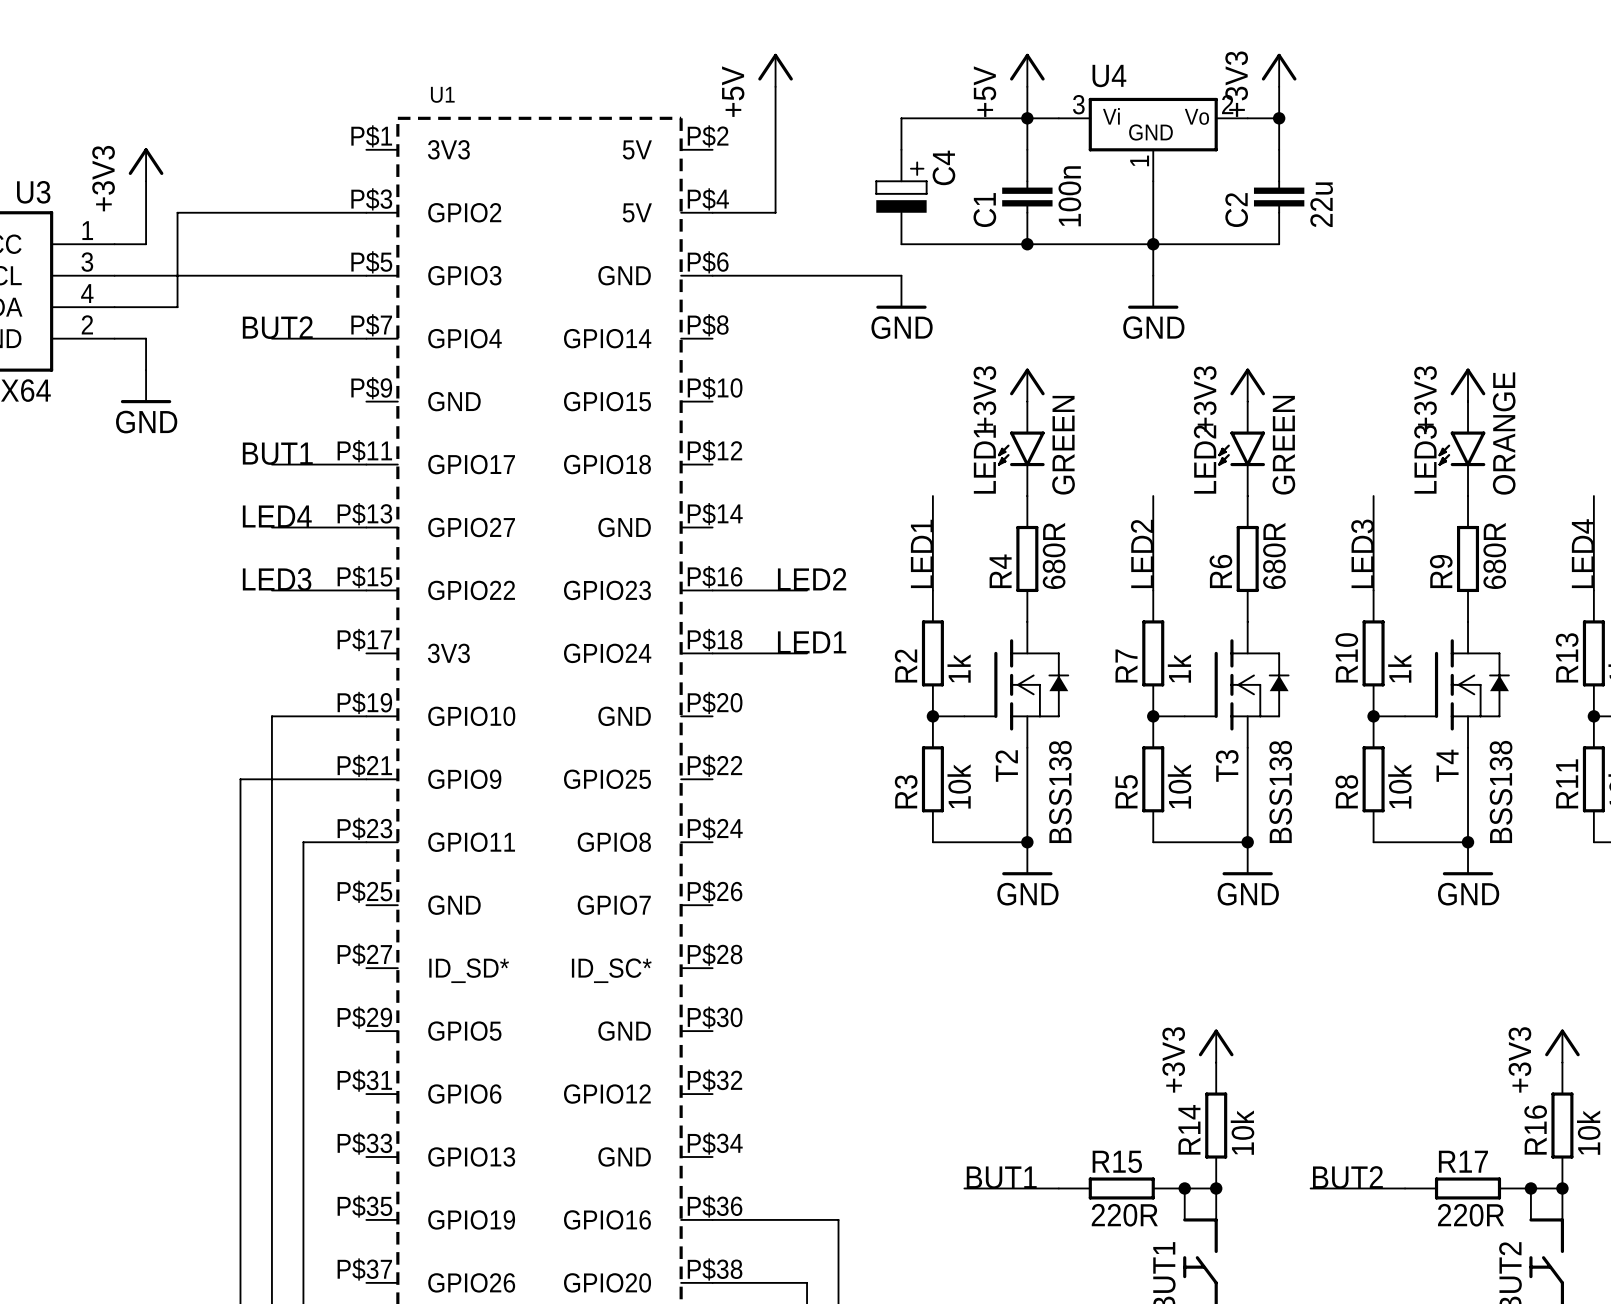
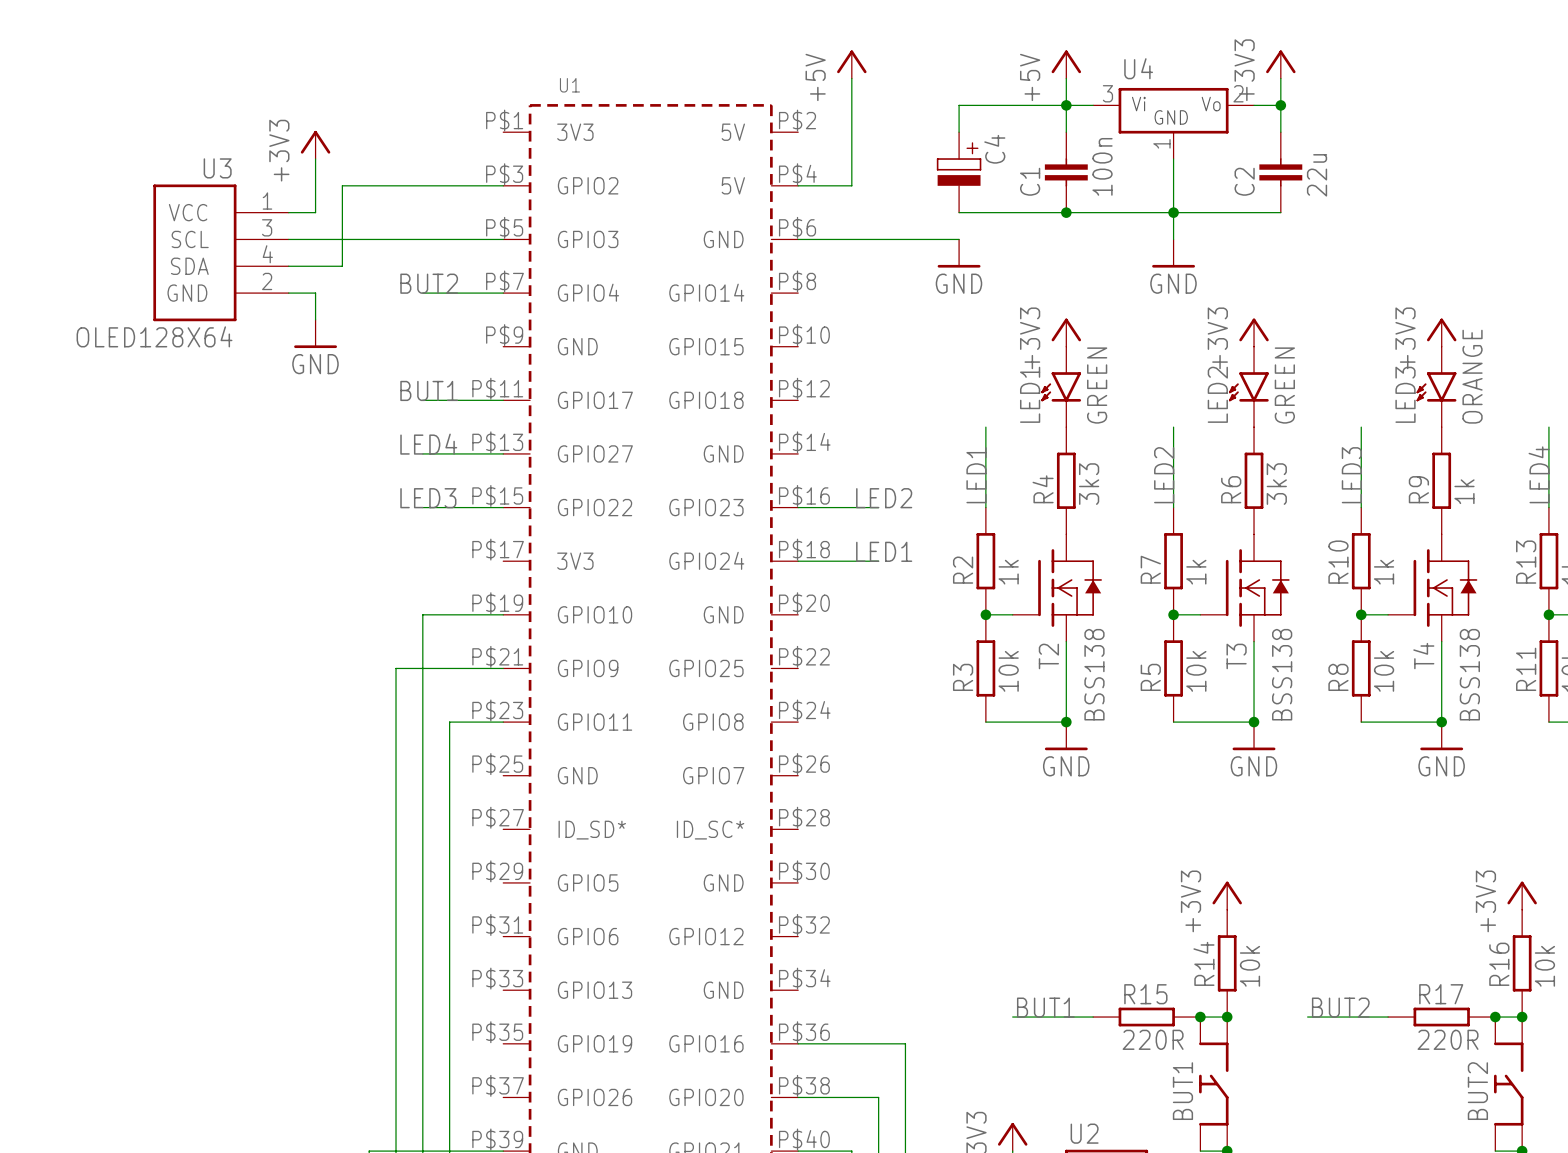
R4 value: 680R (1054, 555) -> 3k3 (1089, 484)
R6 value: 680R (1274, 555) -> 3k3 (1276, 484)
R9 value: 680R (1494, 555) -> 1k (1464, 491)

